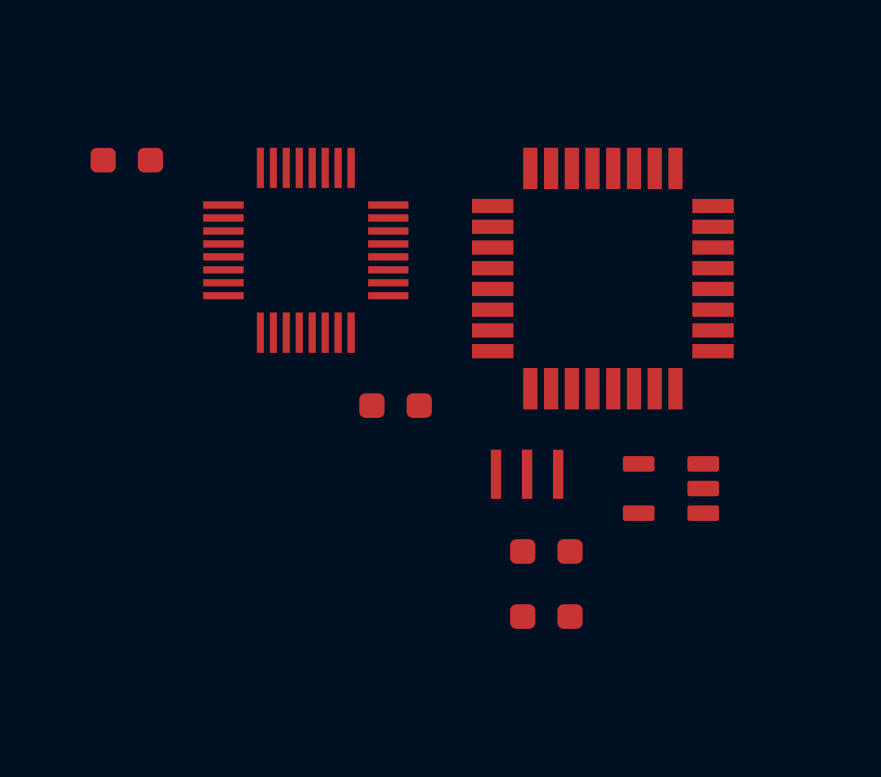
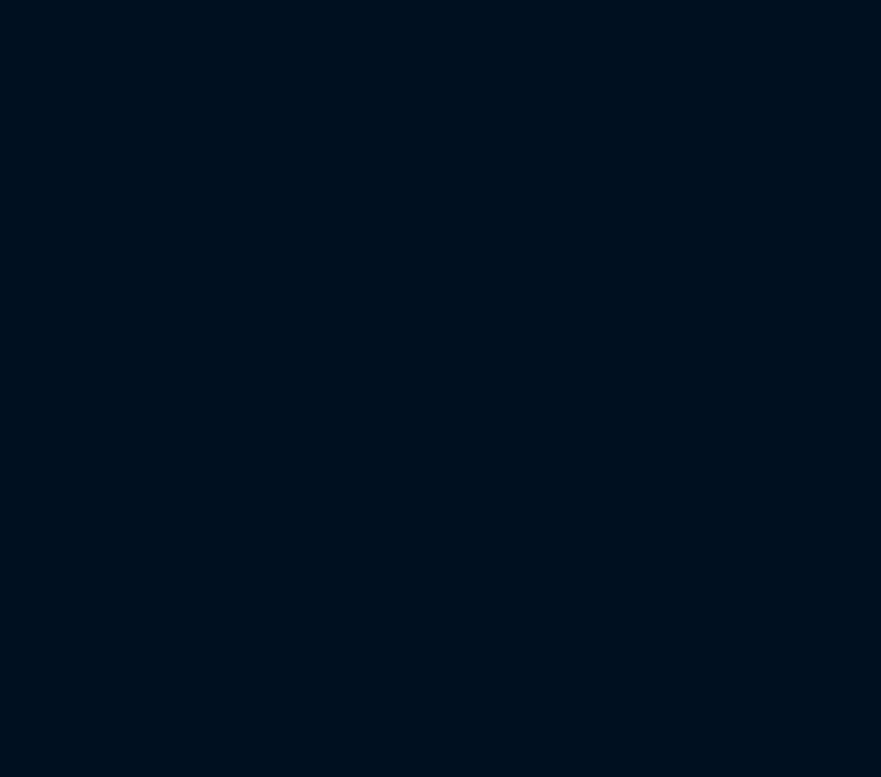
part: (126, 160) -> none
part: (305, 250) -> none
part: (602, 278) -> none
part: (395, 405) -> none
part: (527, 474) -> none
part: (670, 488) -> none
part: (546, 551) -> none
part: (546, 616) -> none

